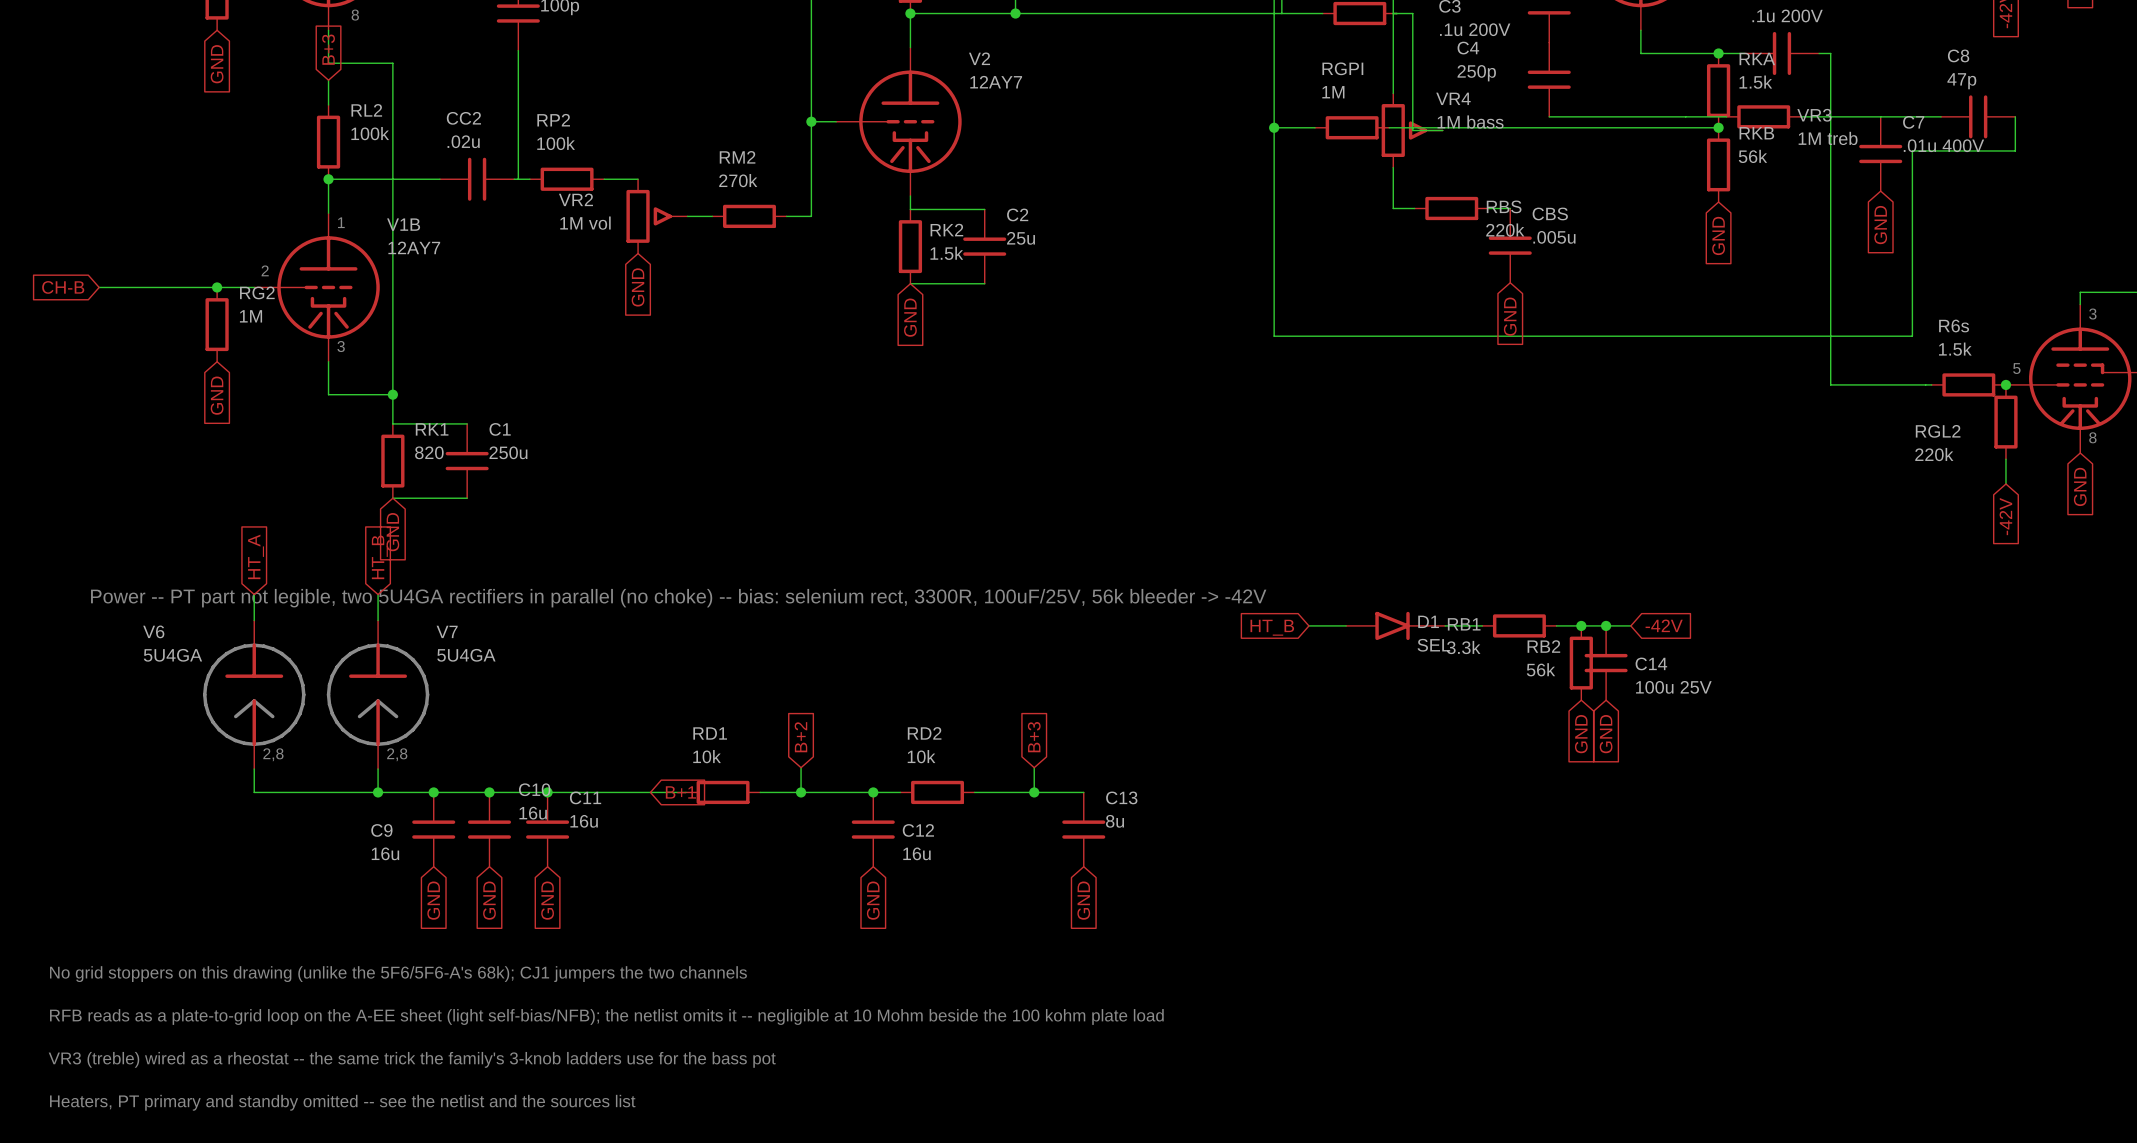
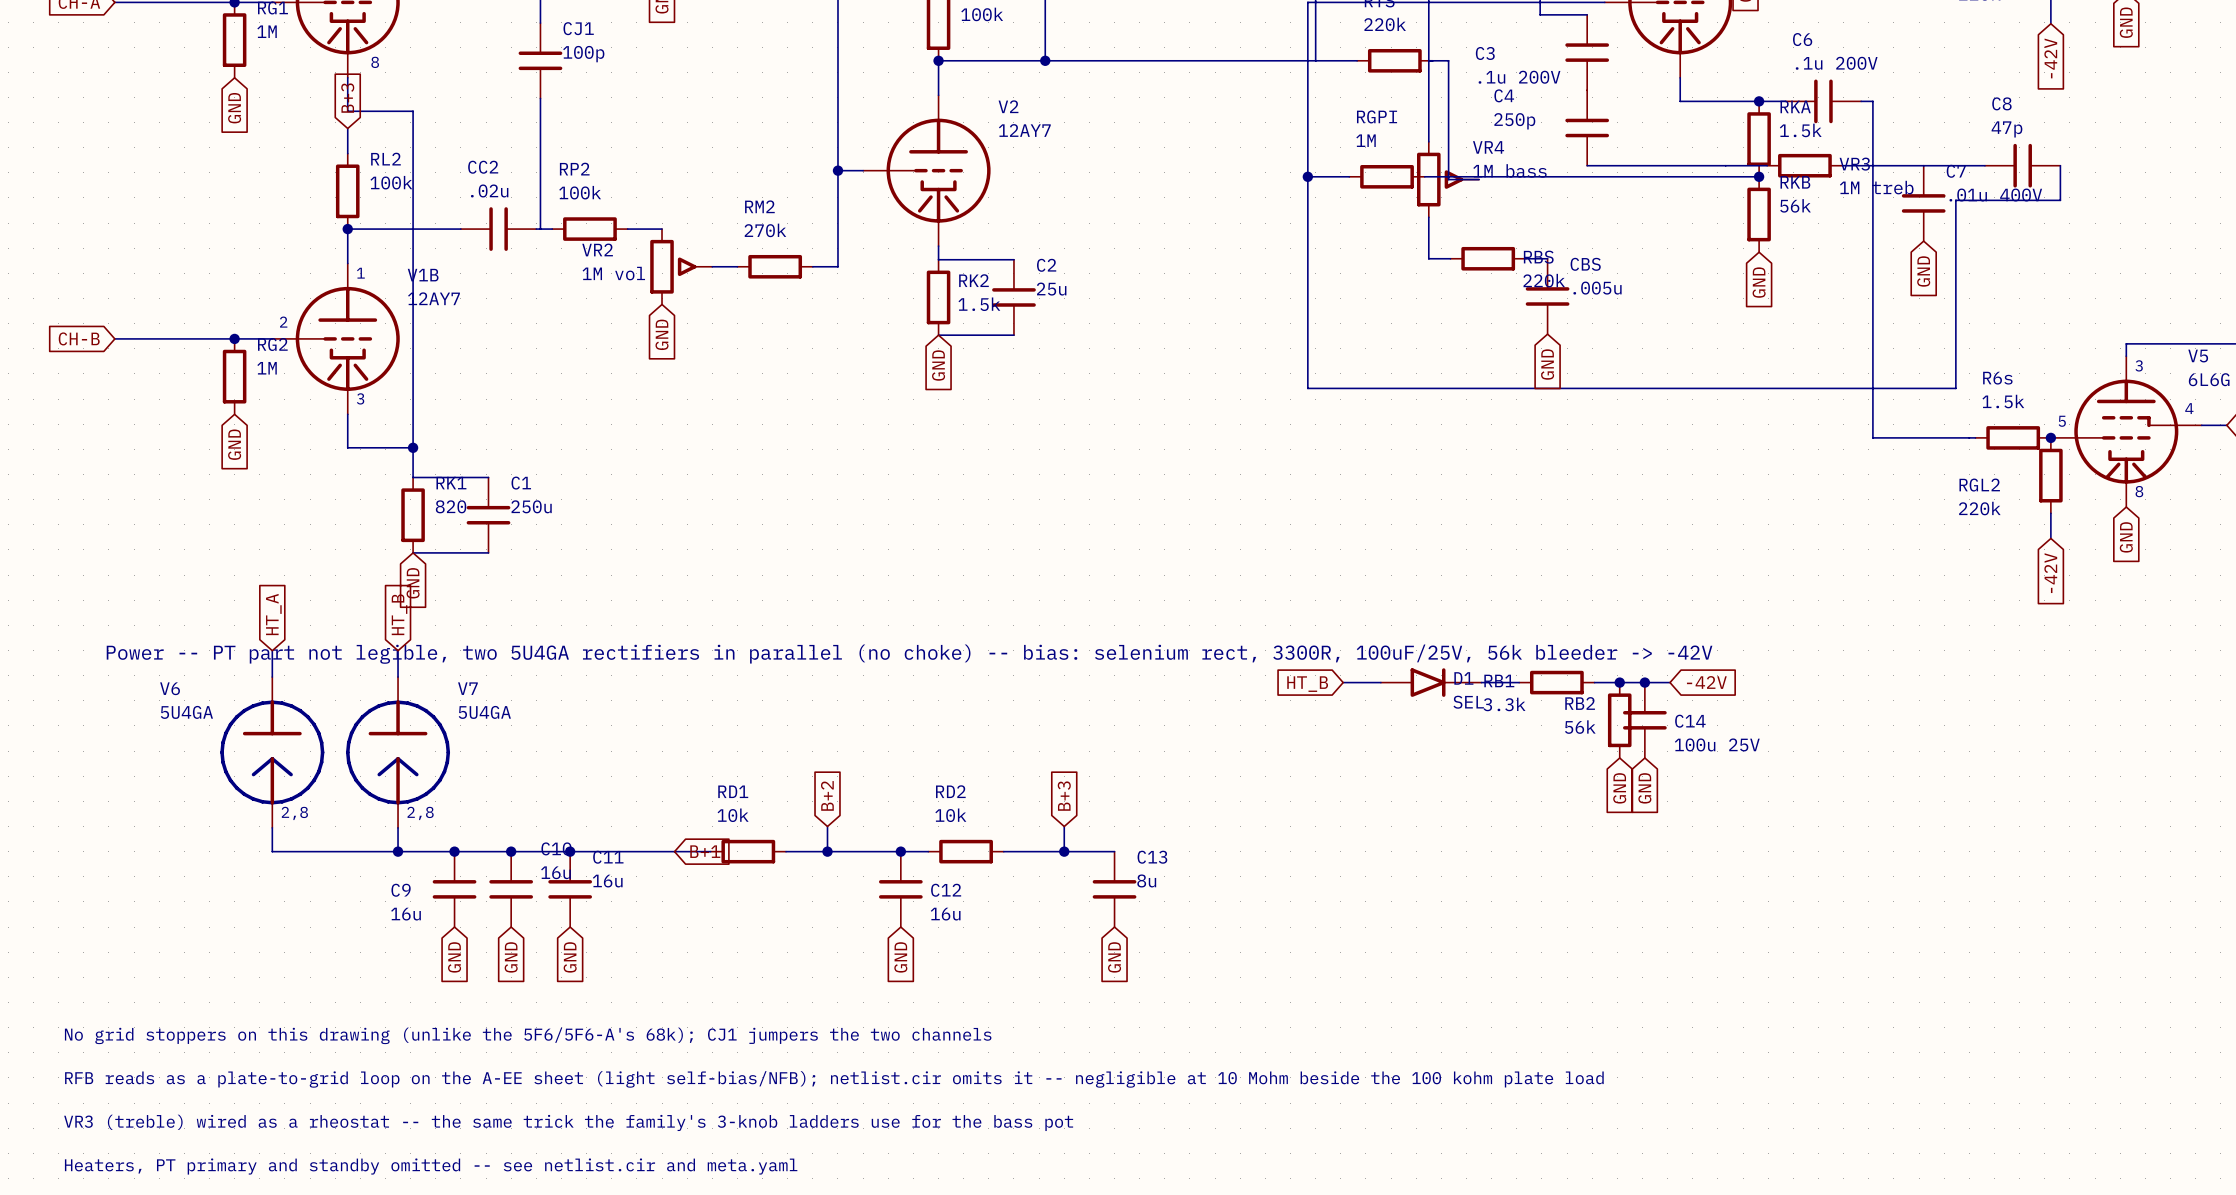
text: RFB reads as a plate-to-grid loop on the A-EE sheet (light self-bias/NFB); the netlist omits it -- negligible at 10 Mohm beside the 100 kohm plate load (606, 1016) -> RFB reads as a plate-to-grid loop on the A-EE sheet (light self-bias/NFB); netlist.cir omits it -- negligible at 10 Mohm beside the 100 kohm plate load (834, 1079)
text: Heaters, PT primary and standby omitted -- see the netlist and the sources list (342, 1102) -> Heaters, PT primary and standby omitted -- see netlist.cir and meta.yaml (431, 1166)

